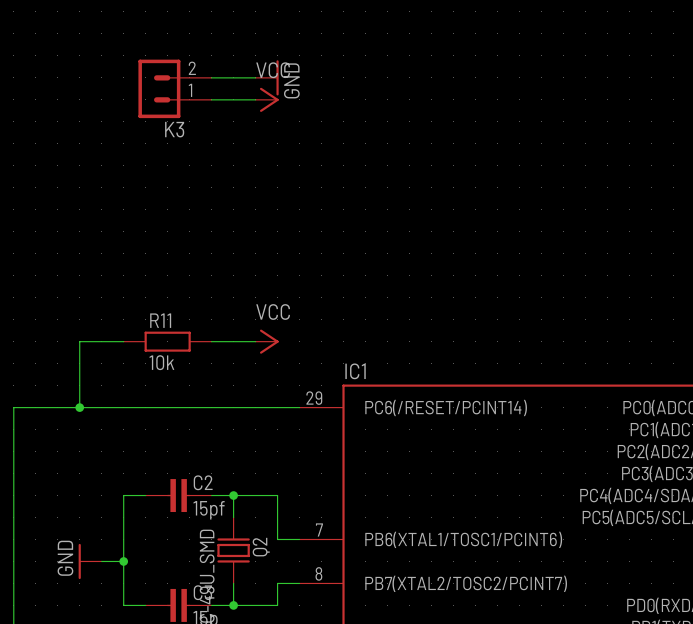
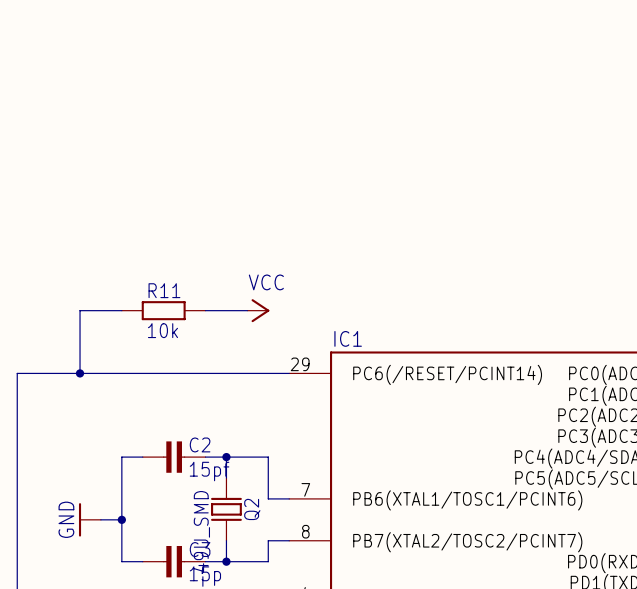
wire: (211, 77) (255, 77) -> none
power symbol: GND (267, 77) -> none
K3: (175, 88) -> none
wire: (211, 99) (255, 99) -> none
power symbol: VCC (267, 99) -> none

